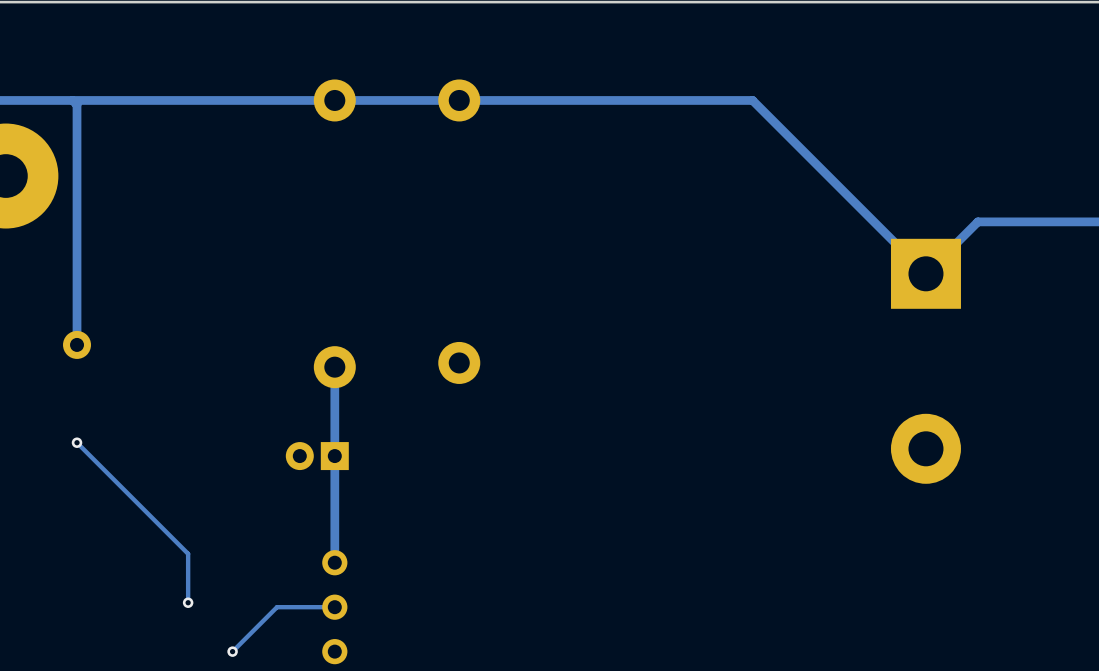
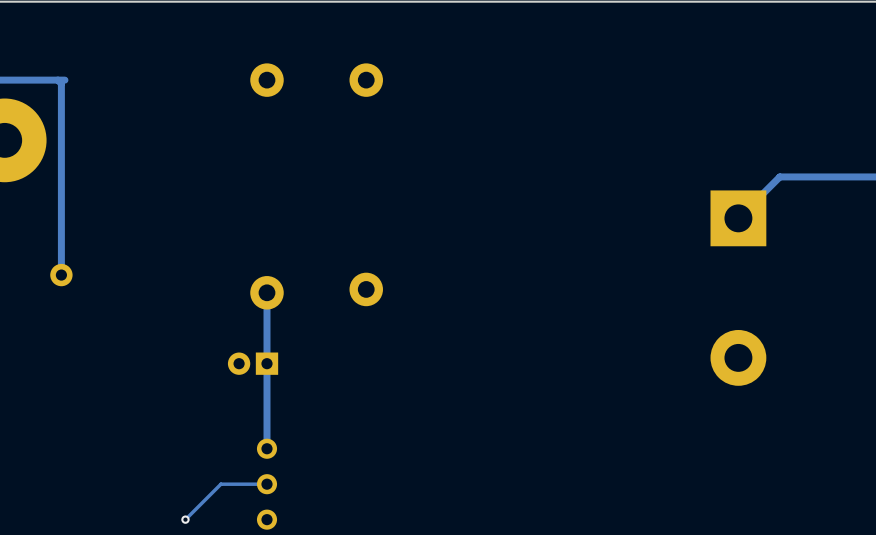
track: (81, 100) (752, 100) (925, 273) -> none
track: (77, 442) (188, 553) (188, 602) -> none
via: (77, 442) -> none
via: (188, 602) -> none

